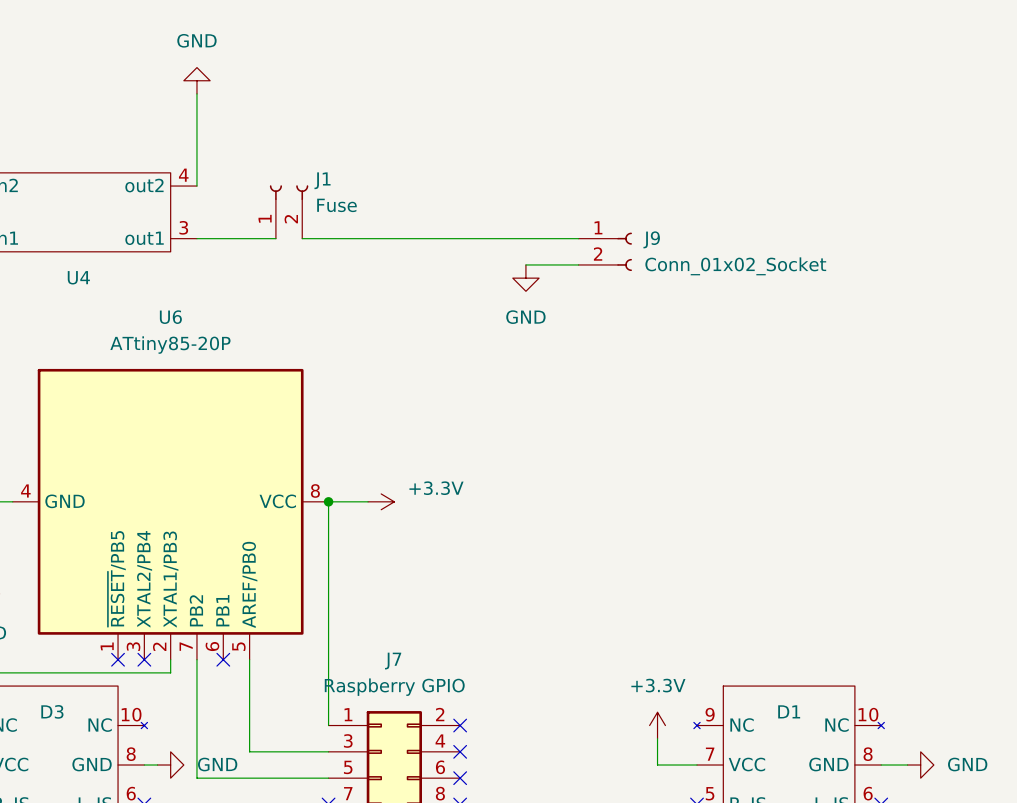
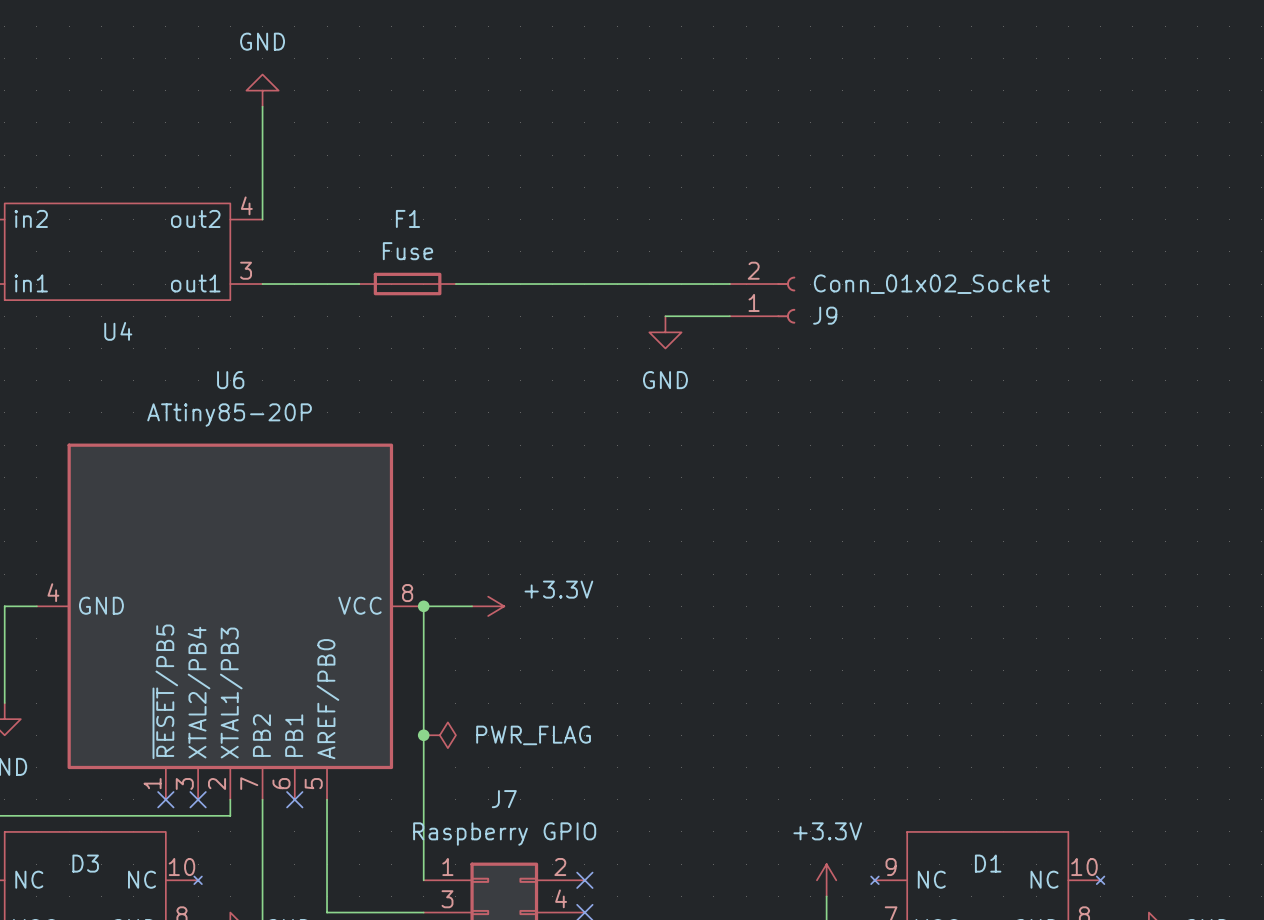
J1: Fuse (289, 211) -> none
F1: none -> Fuse (407, 284)
J9 flip: as is (624, 251) -> up-down (786, 300)
junction: none -> (423, 735)
power symbol: none -> PWR_FLAG (439, 735)

